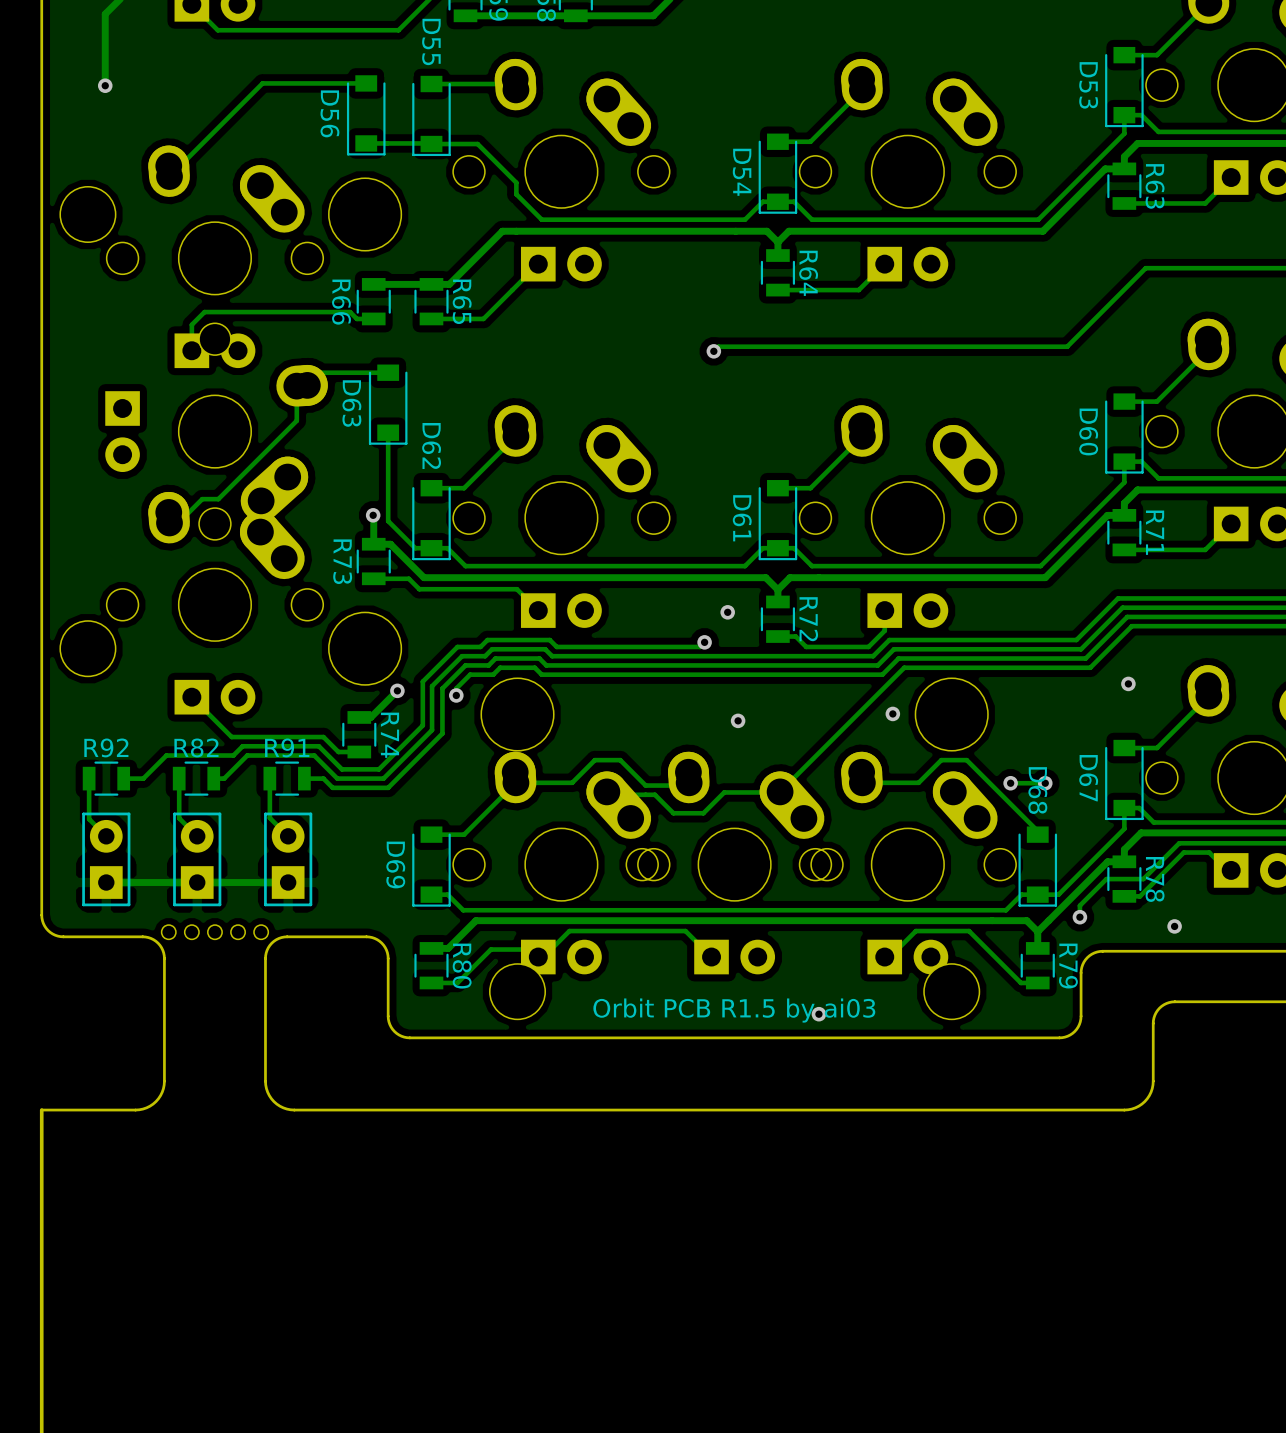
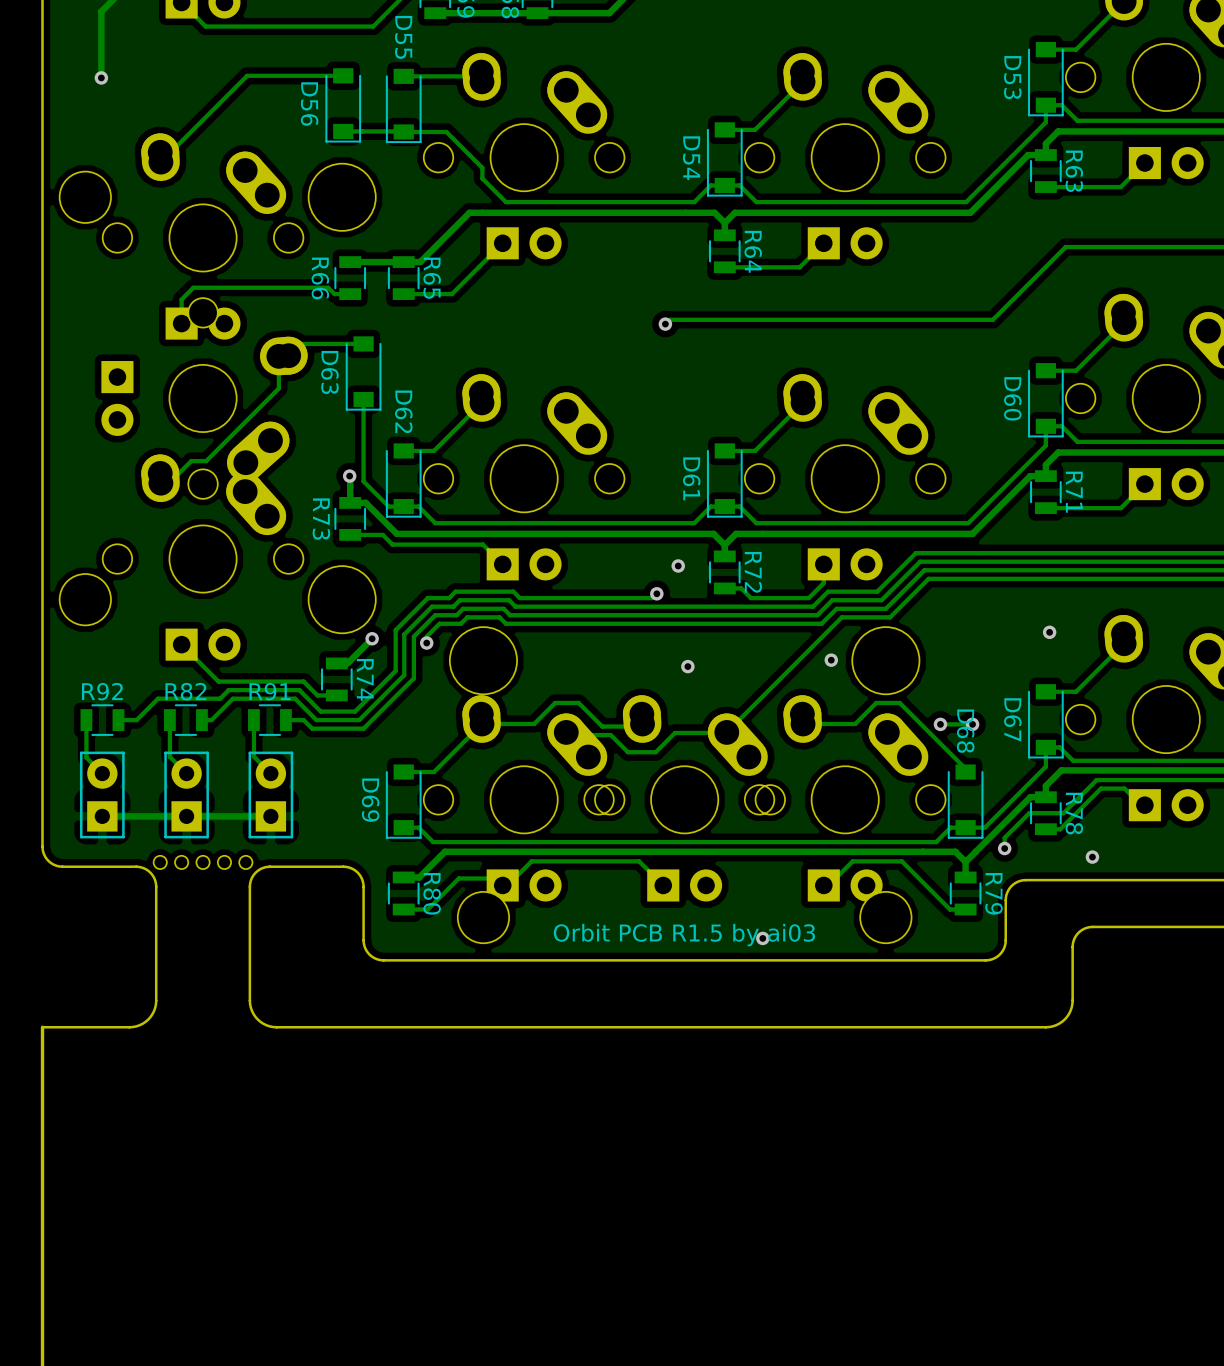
track: (1118, 598) (1076, 640) (942, 640) -> (1039, 553) (915, 553) (877, 591)
track: (1122, 607) (1081, 649) (947, 649) -> (1044, 561) (920, 561) (881, 600)
track: (1127, 616) (1085, 658) (951, 658) -> (1048, 570) (924, 570) (885, 608)
track: (1131, 626) (1090, 667) (956, 667) -> (1052, 578) (928, 578) (890, 617)

